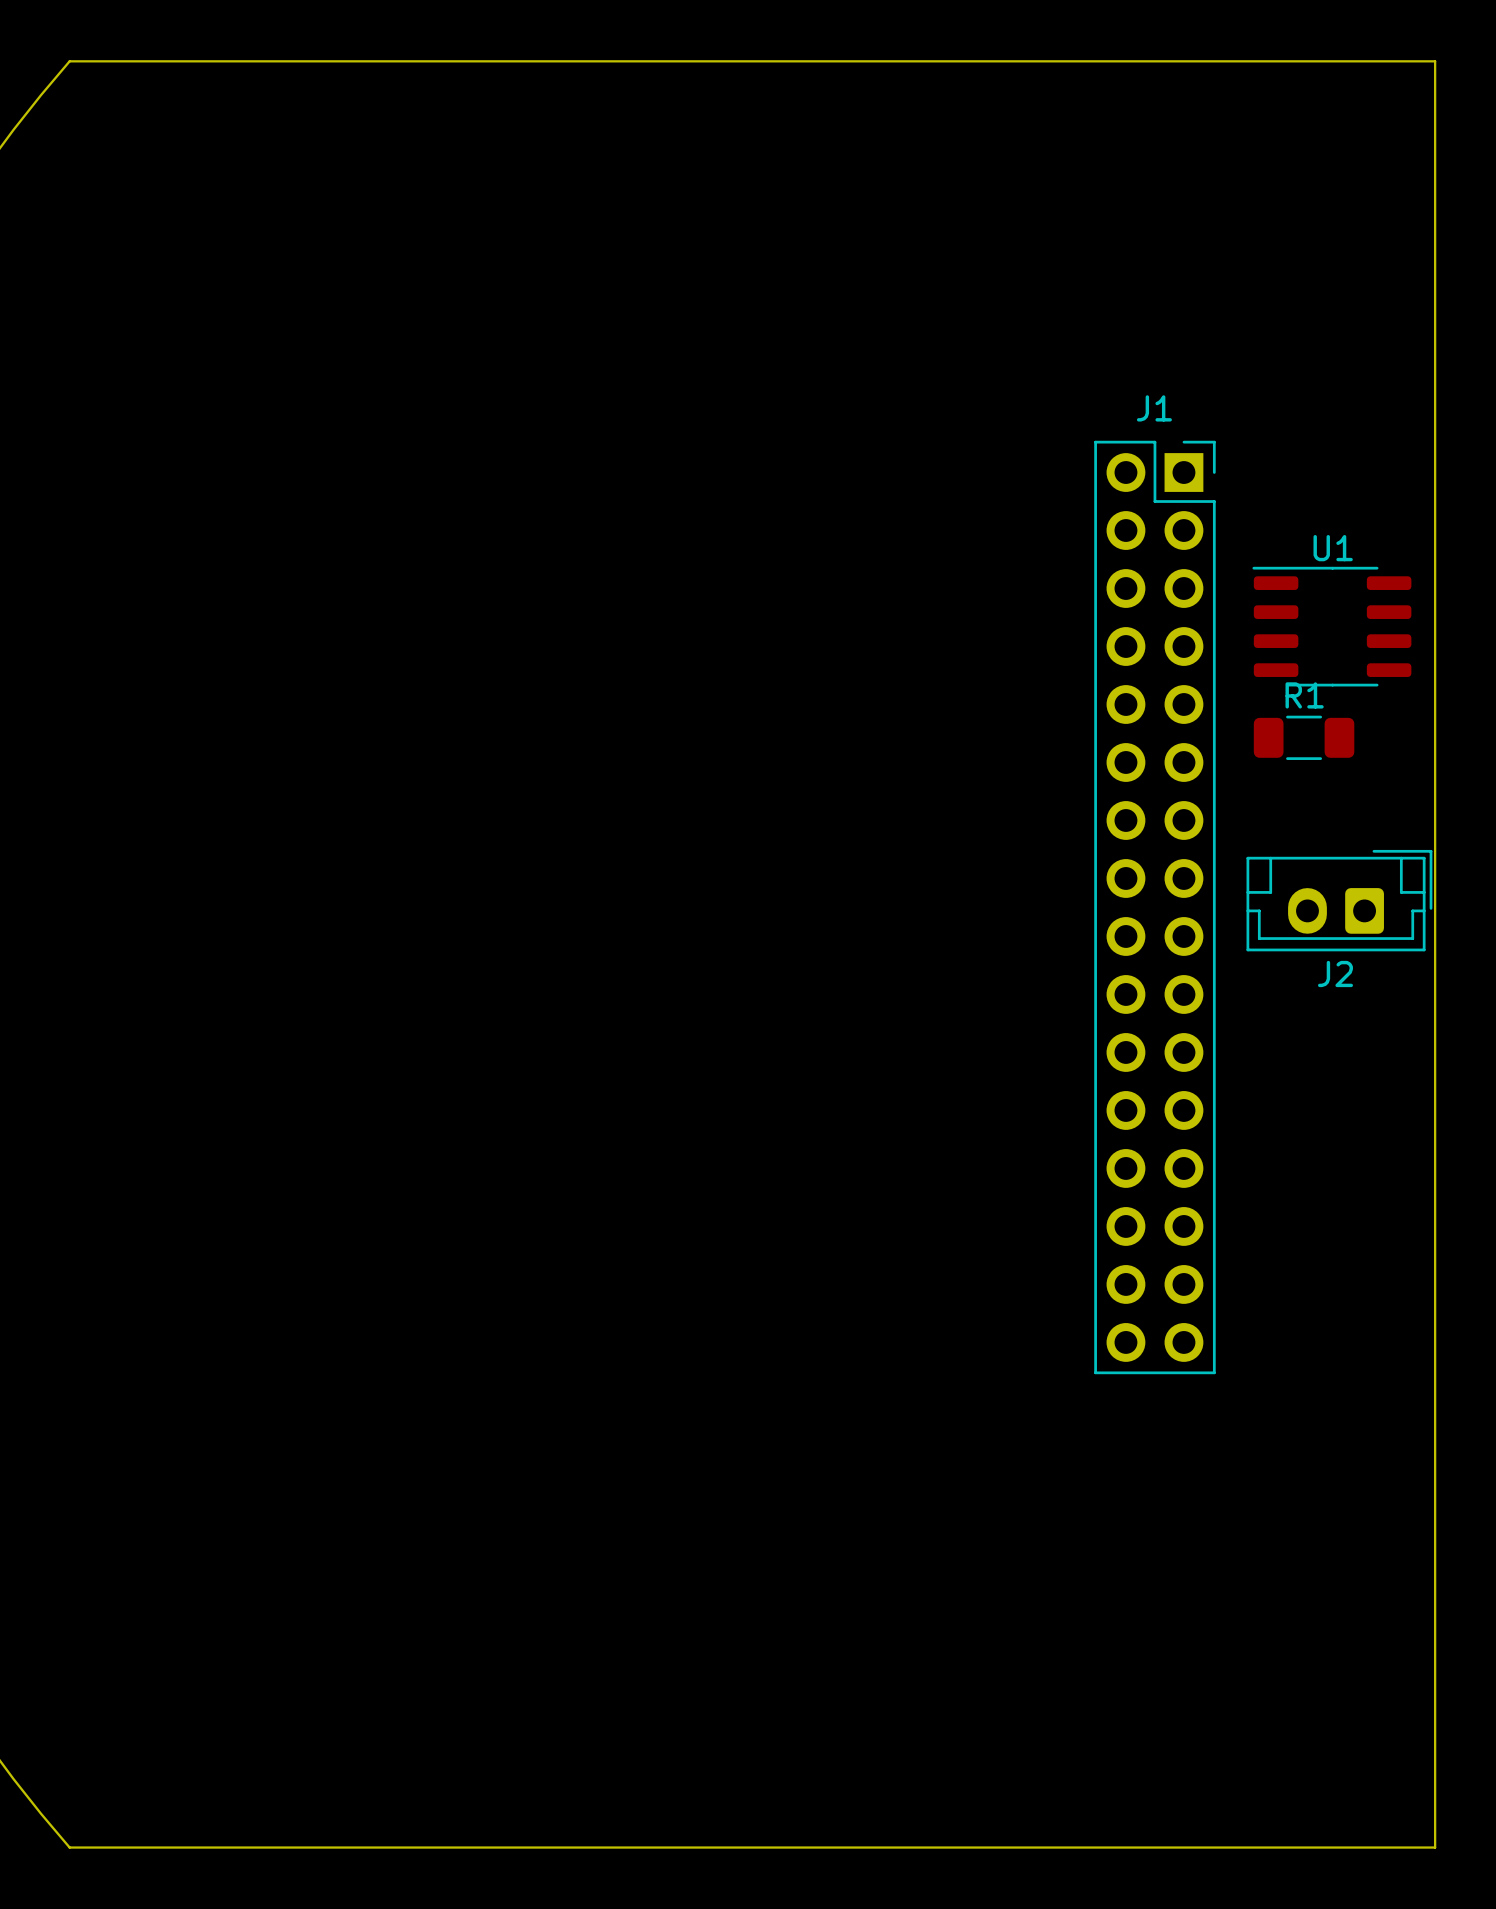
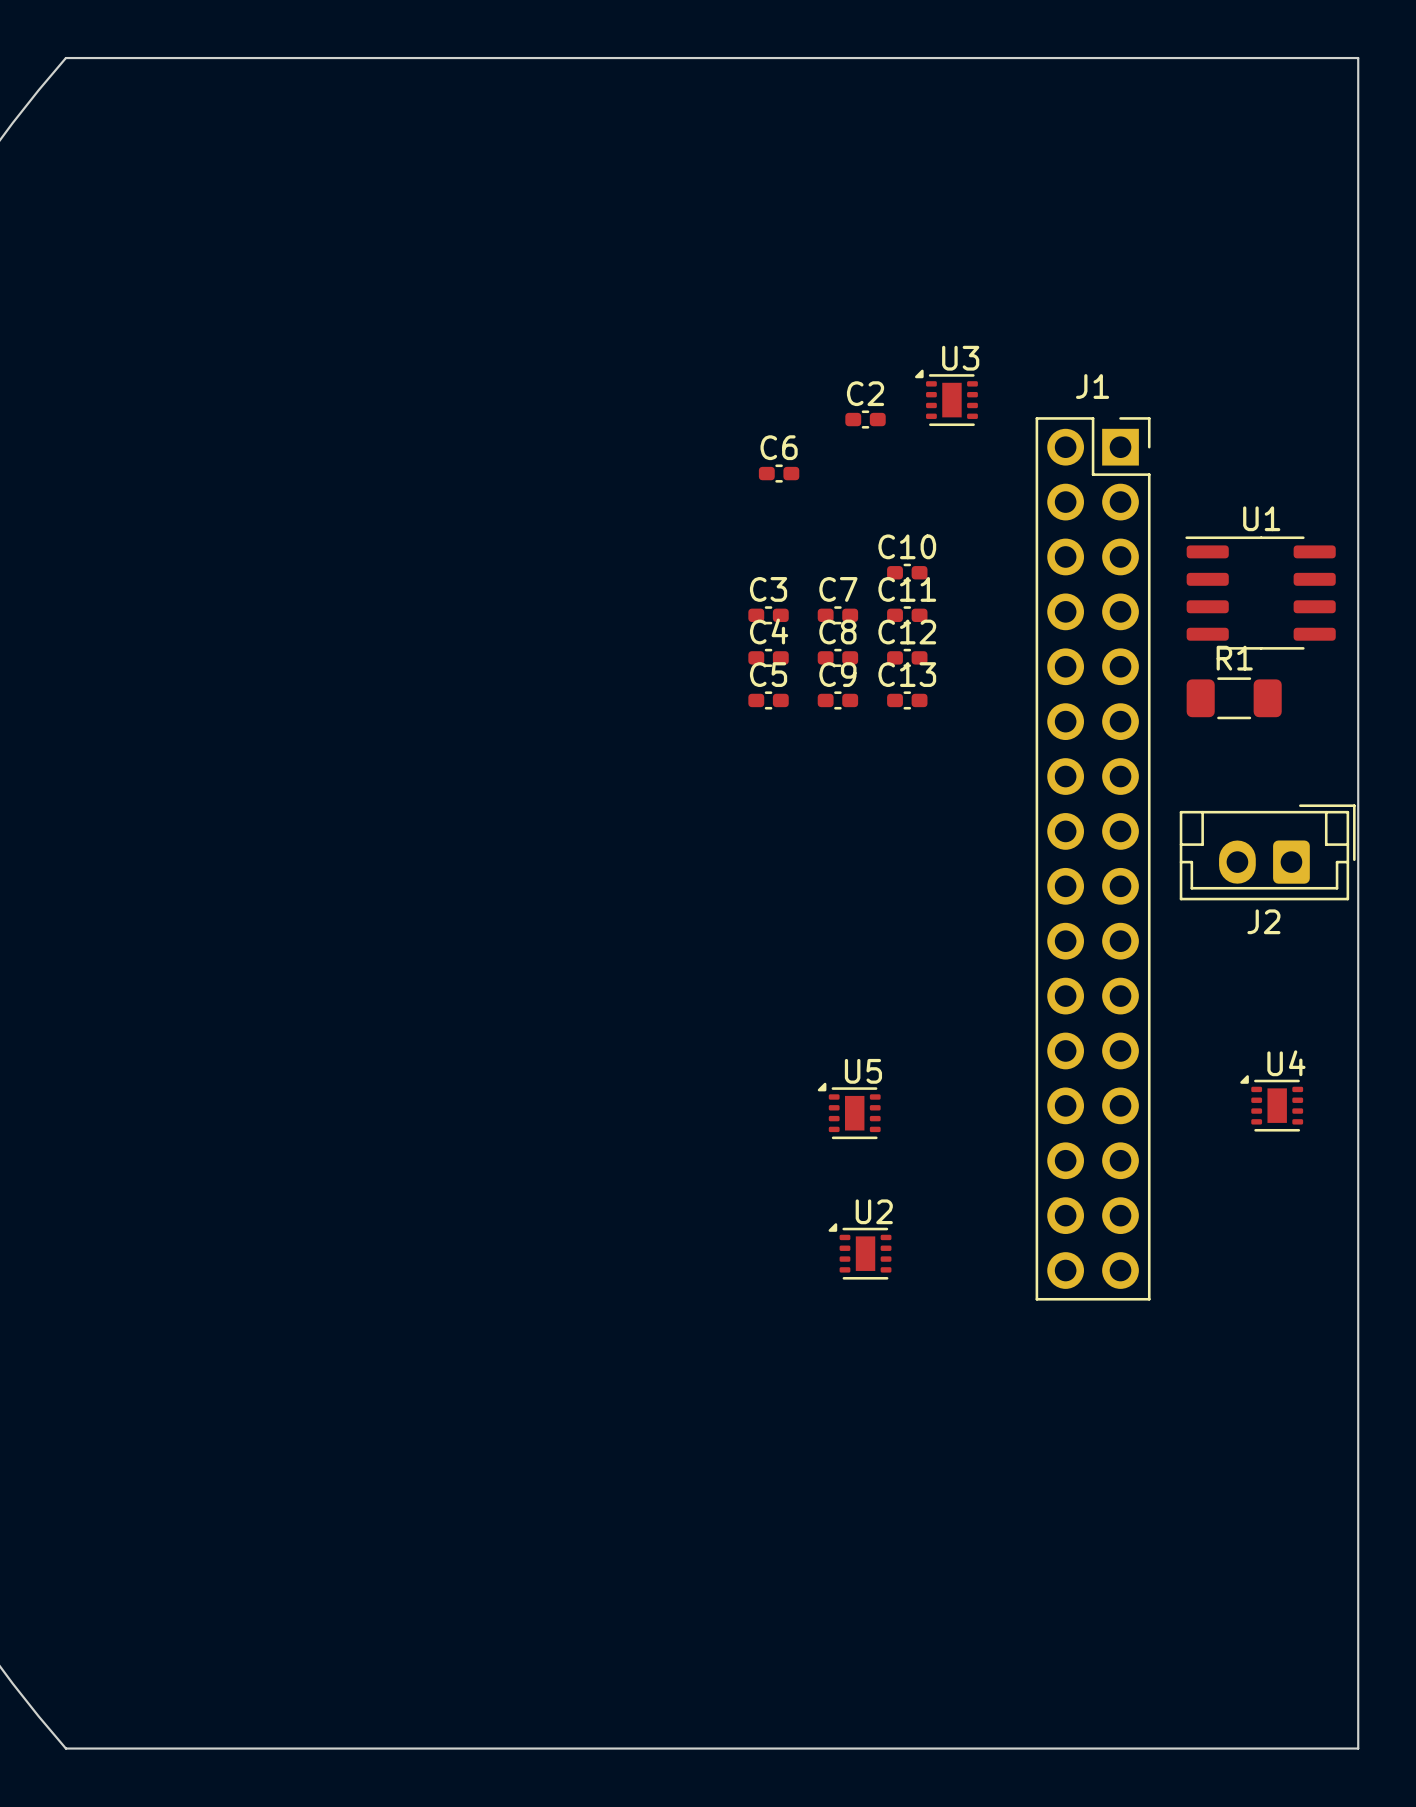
U3: none -> (946, 397)
C2: none -> (865, 419)
C6: none -> (779, 473)
C10: none -> (907, 572)
C3: none -> (768, 615)
C7: none -> (837, 615)
C11: none -> (907, 615)
C4: none -> (768, 657)
C8: none -> (837, 657)
C12: none -> (907, 657)
C5: none -> (768, 700)
C9: none -> (837, 700)
C13: none -> (907, 700)
U4: none -> (1271, 1103)
U5: none -> (849, 1110)
U2: none -> (860, 1251)

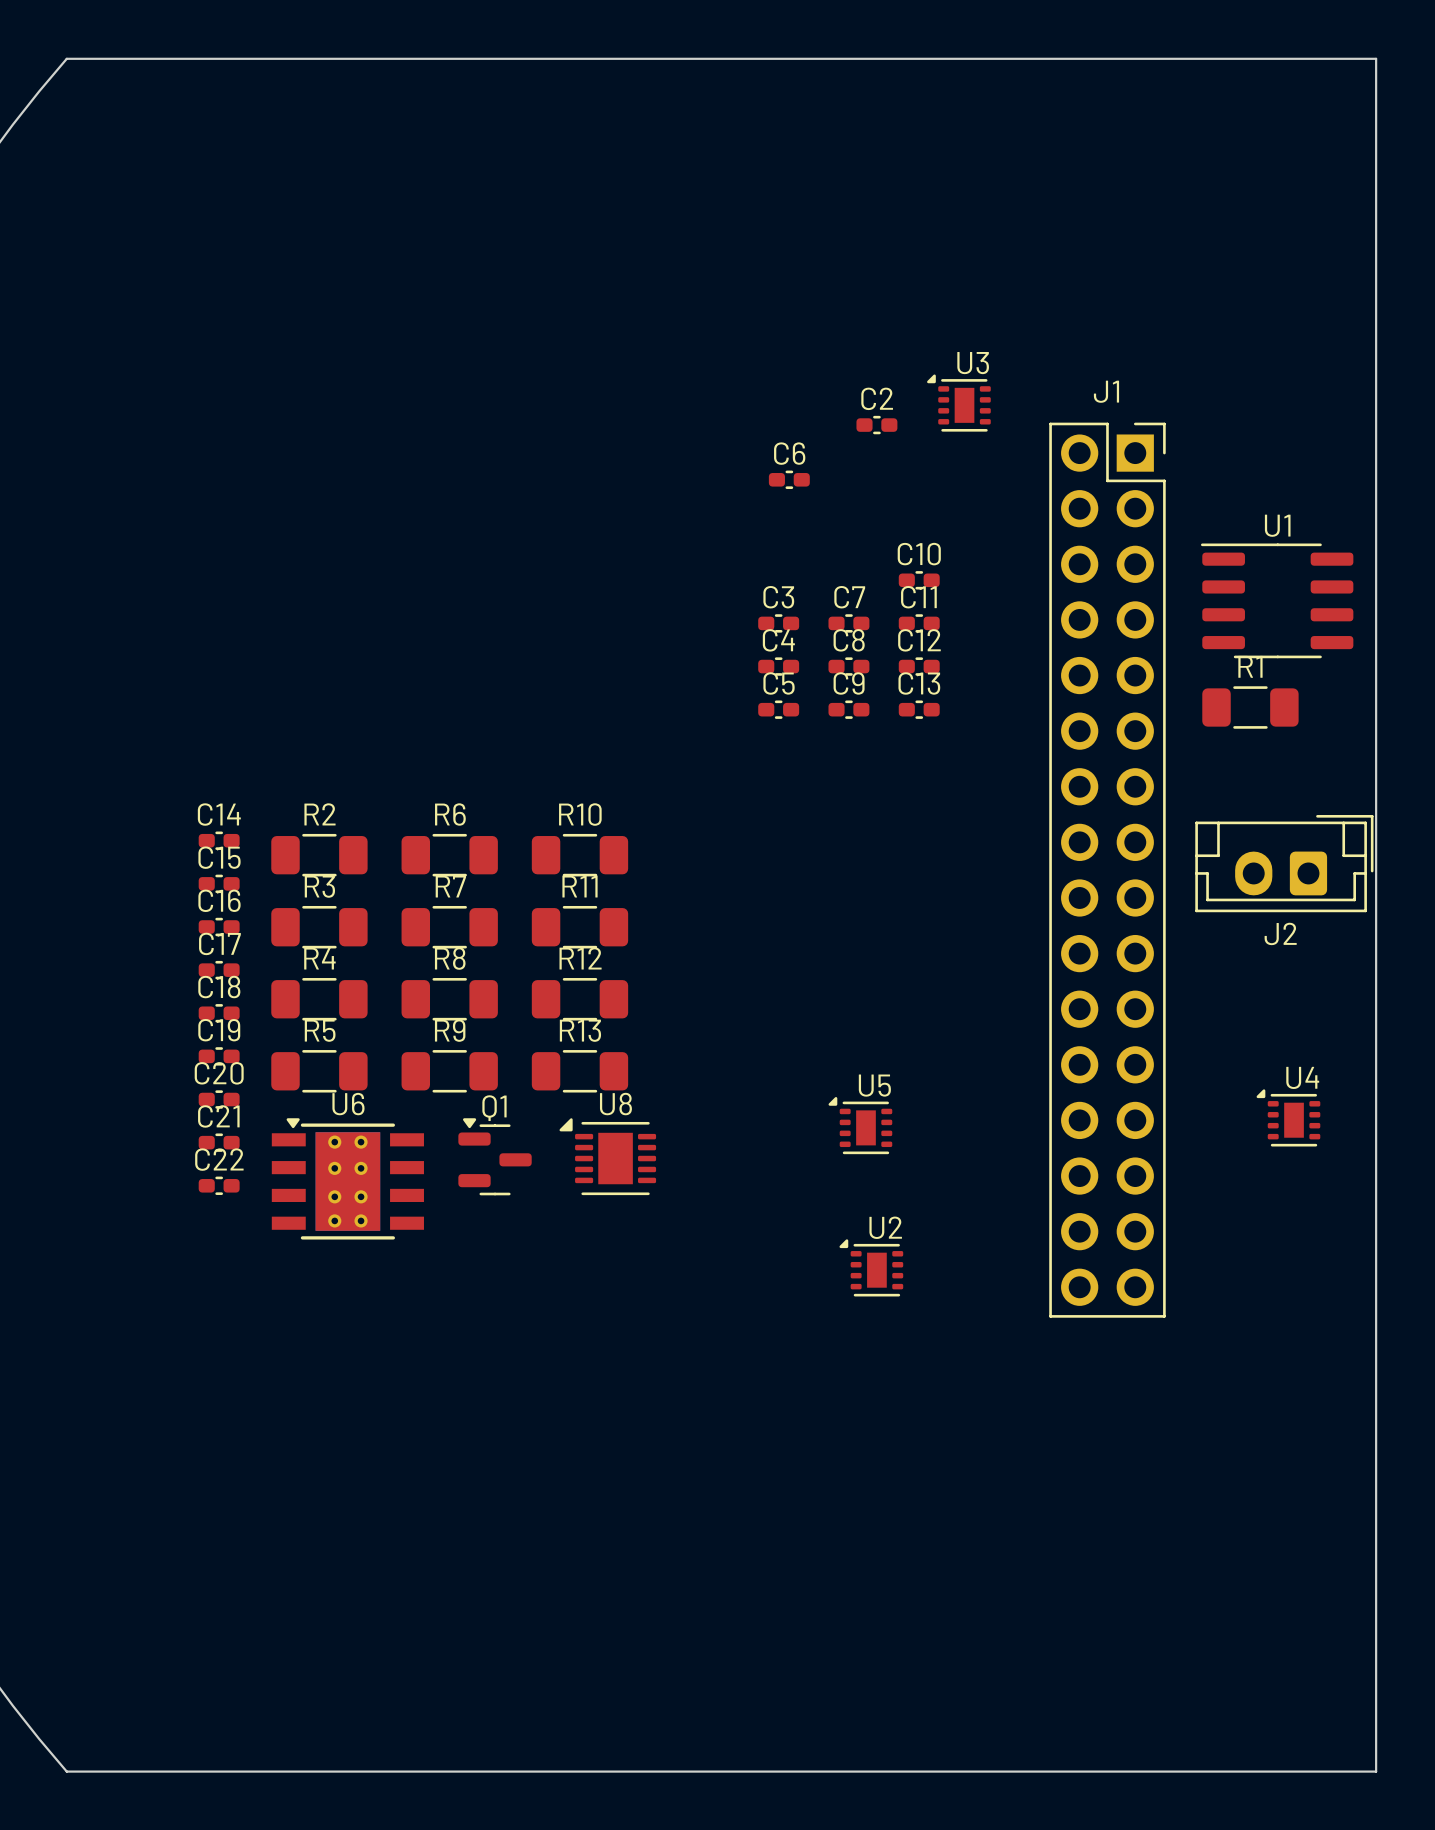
C14: none -> (219, 840)
R2: none -> (319, 855)
R6: none -> (449, 855)
R10: none -> (579, 855)
C15: none -> (219, 883)
C16: none -> (219, 926)
R3: none -> (319, 927)
R7: none -> (449, 927)
R11: none -> (579, 927)
C17: none -> (219, 970)
R4: none -> (319, 999)
R8: none -> (449, 999)
R12: none -> (579, 999)
C18: none -> (219, 1013)
C19: none -> (219, 1056)
R5: none -> (319, 1071)
R9: none -> (449, 1071)
R13: none -> (579, 1071)
C20: none -> (219, 1099)
C21: none -> (219, 1142)
Q1: none -> (495, 1156)
U8: none -> (607, 1156)
U6: none -> (347, 1178)
C22: none -> (219, 1185)

